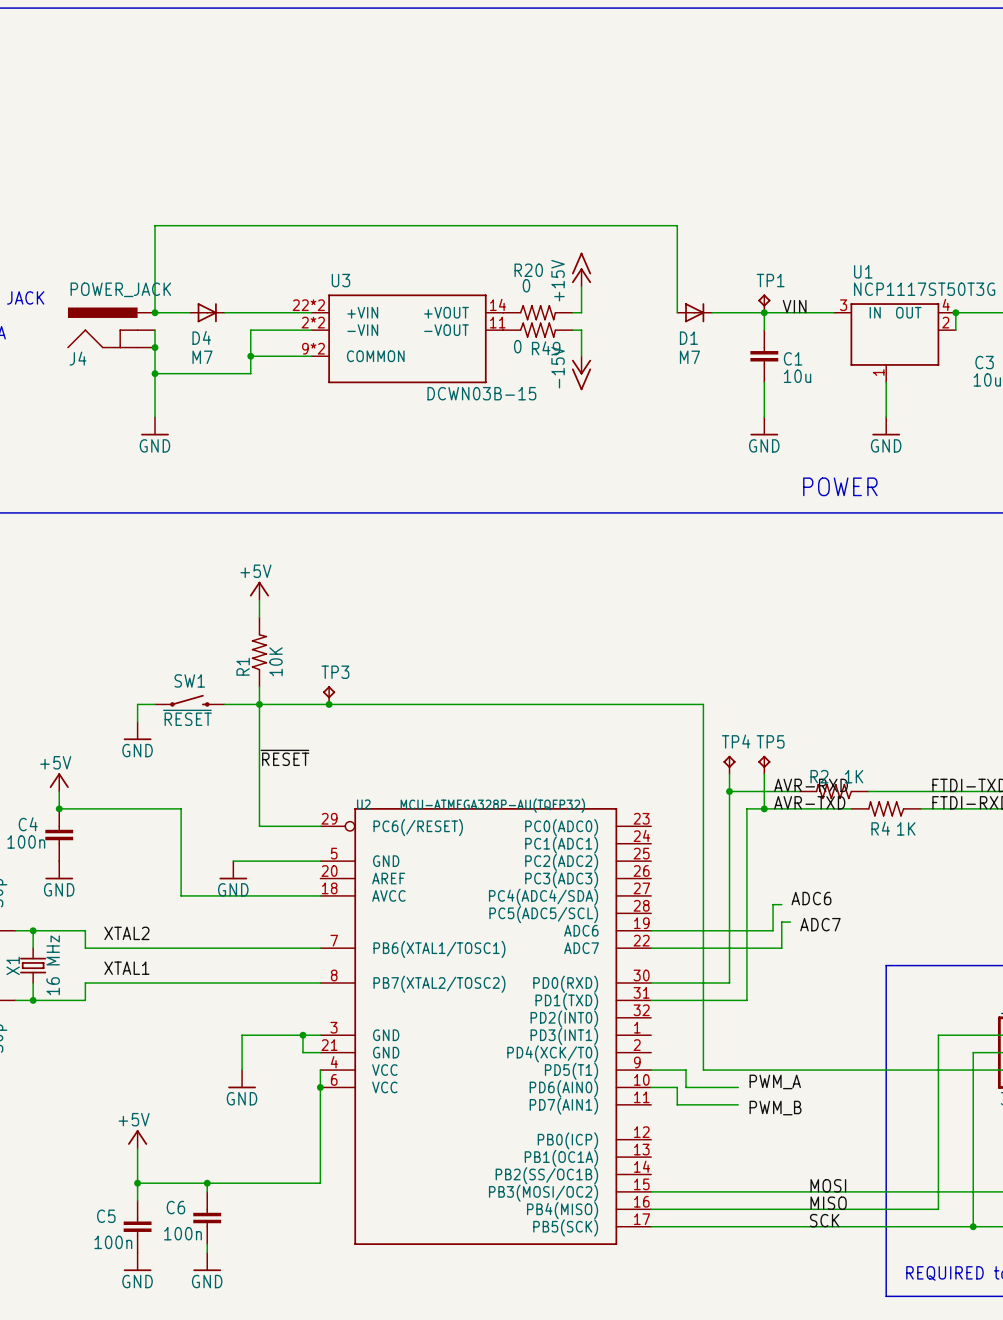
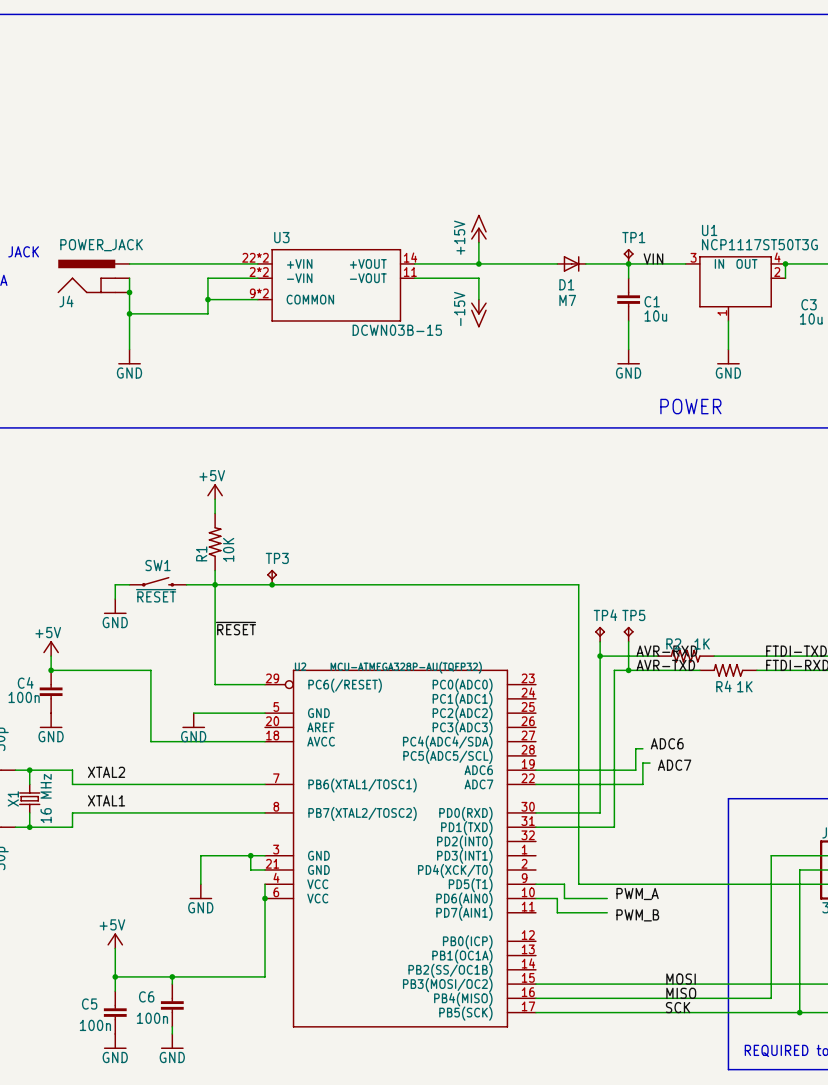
wire: (155, 312) (155, 225) (677, 225) (677, 312) -> (478, 263) (557, 263)
junction: (155, 312) -> none
D4: M7 (207, 312) -> none
R20: 0 (538, 312) -> none
junction: none -> (478, 263)
R49: 0 (538, 330) -> none

